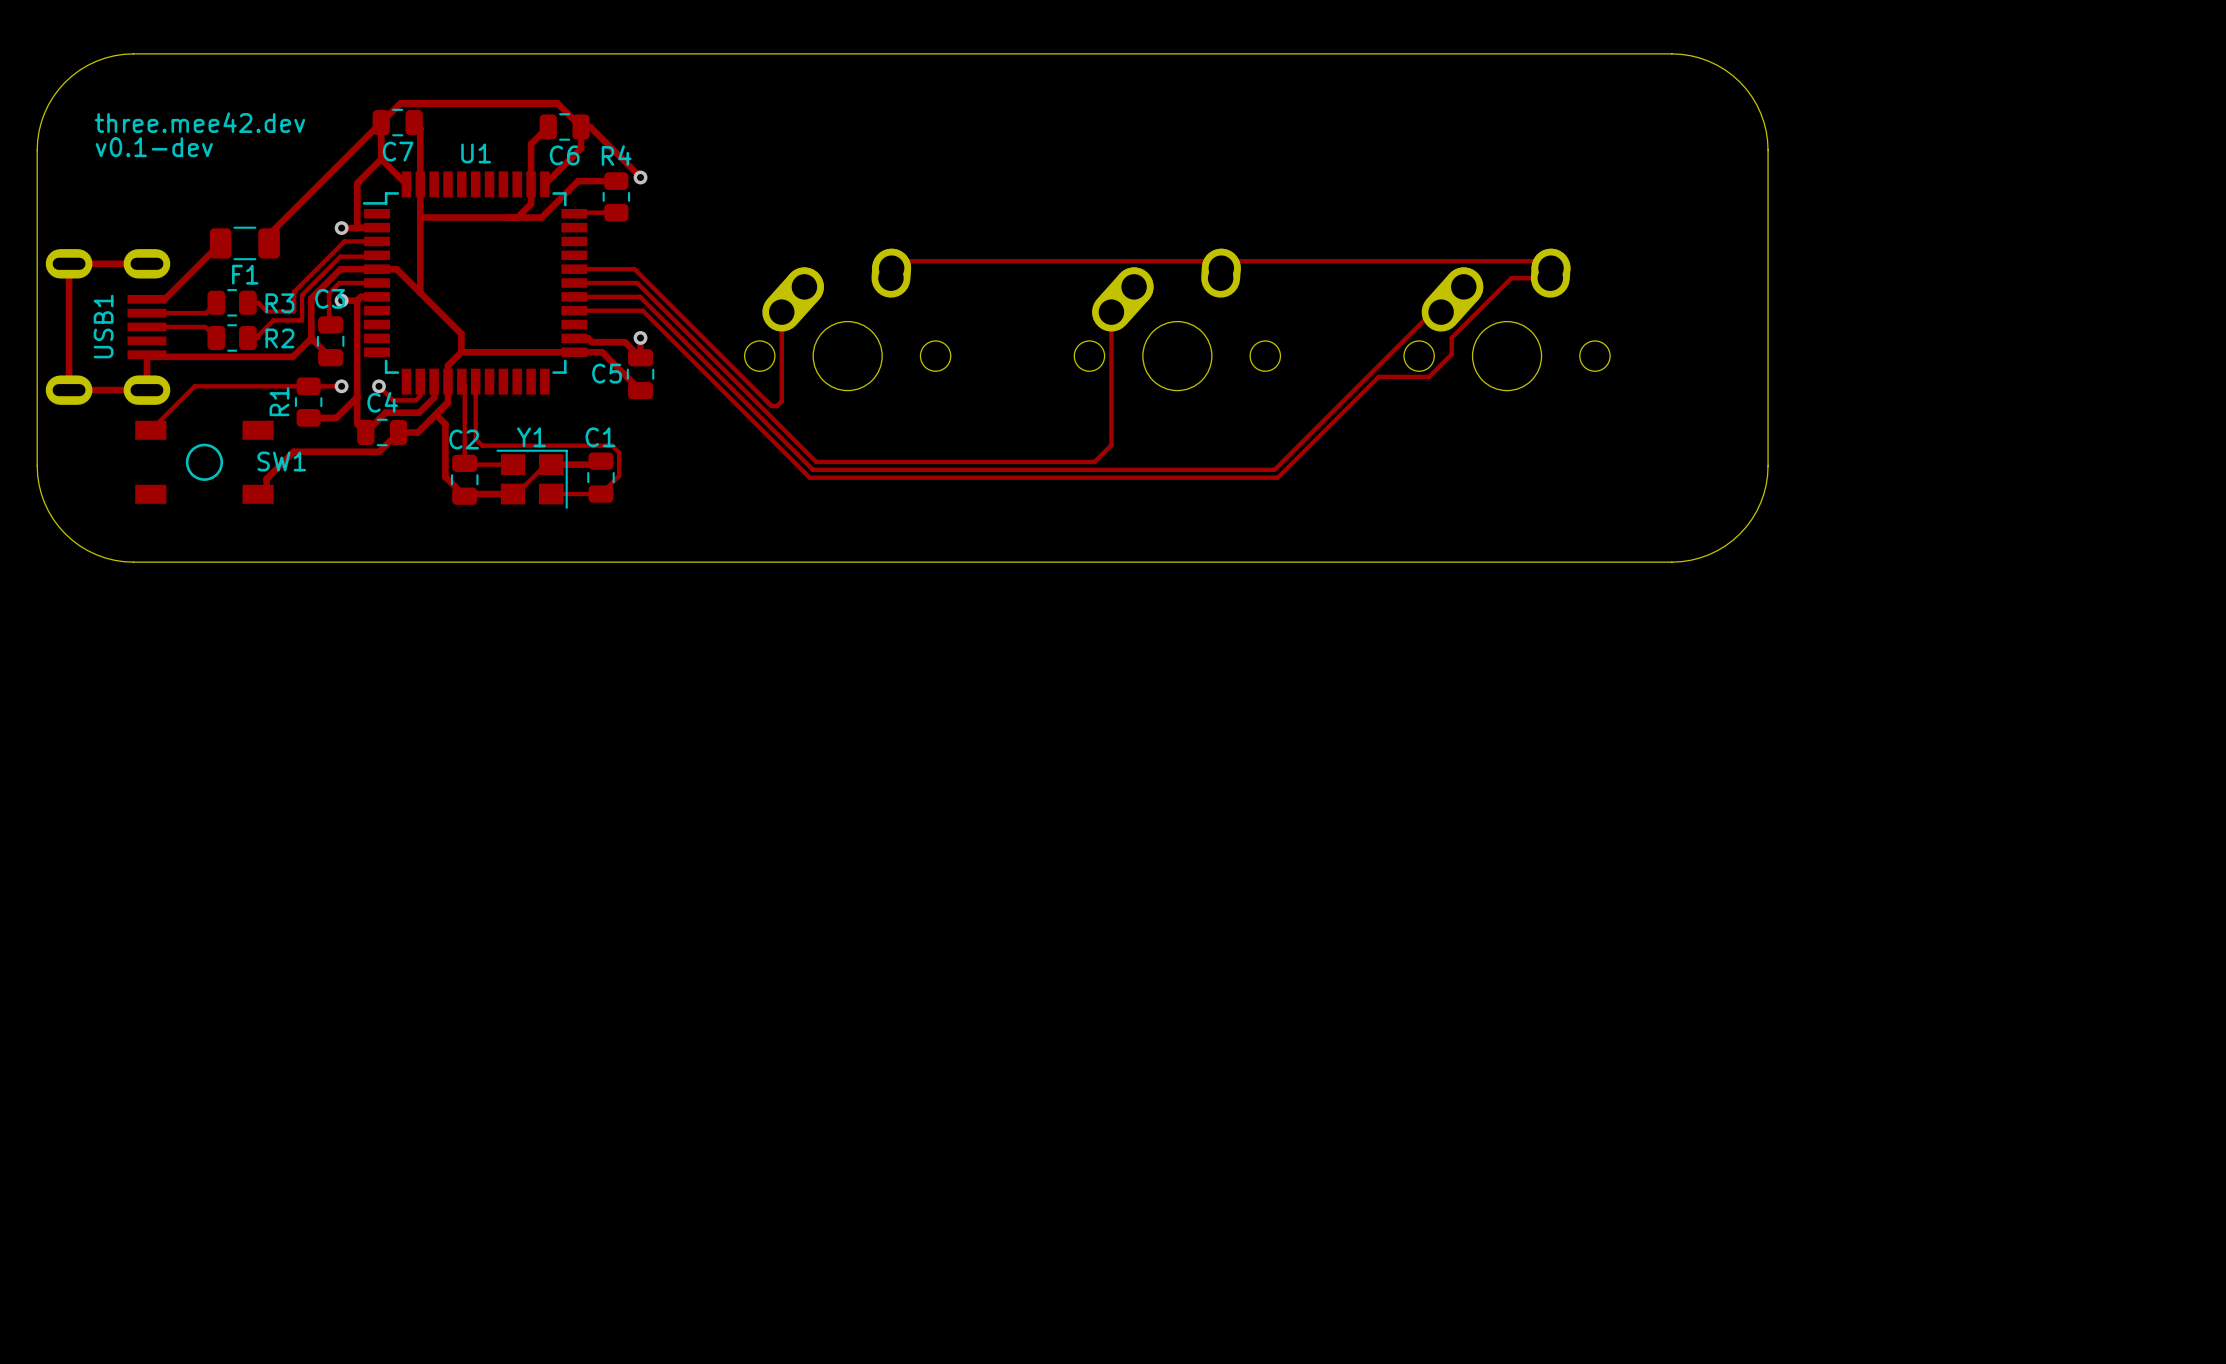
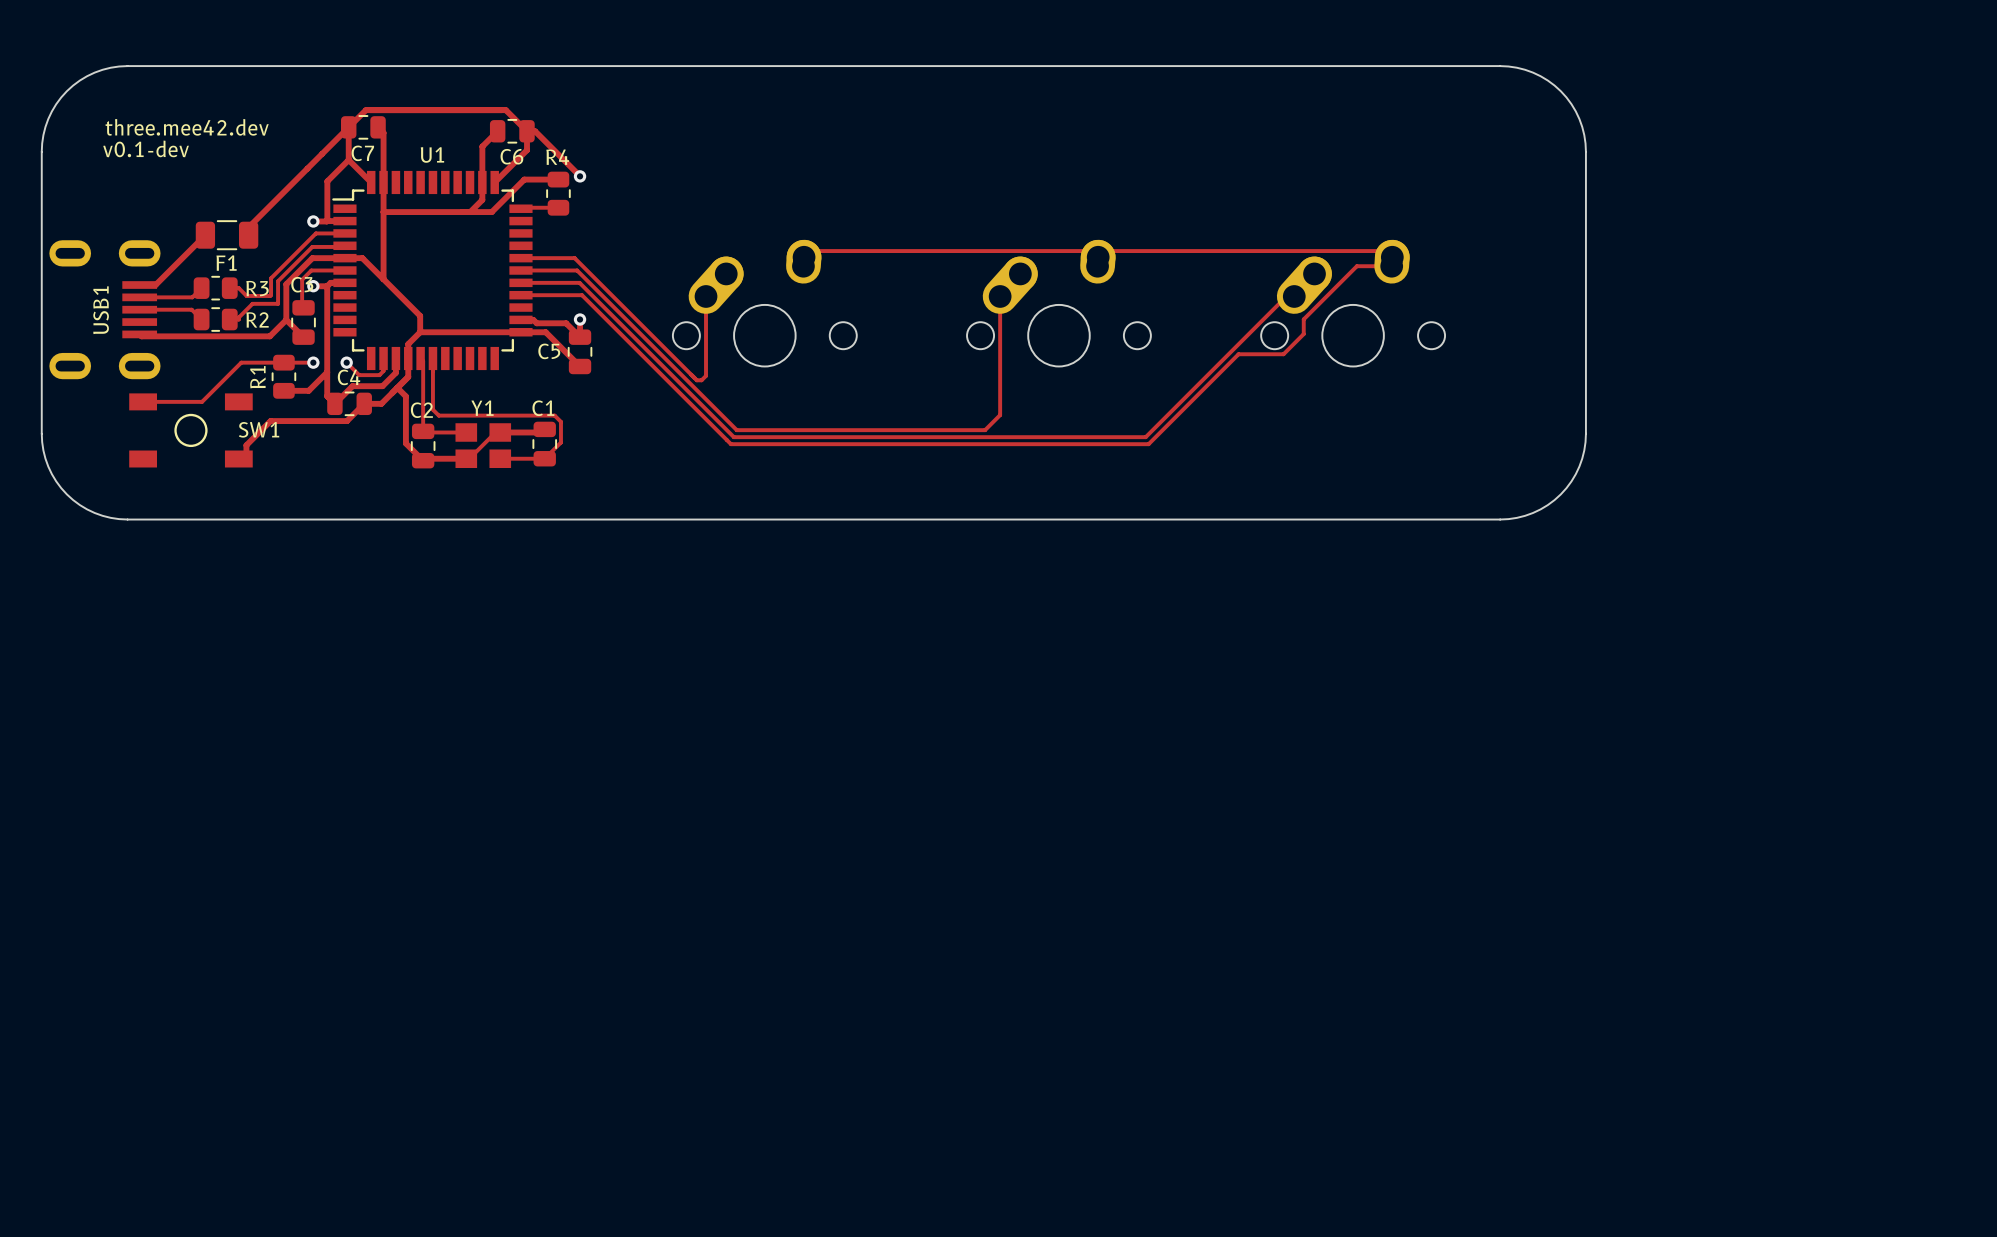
track: (146, 263) (69, 263) (69, 390) (146, 390) (146, 354) -> none
track: (260, 386) (194, 386) (150, 430) -> (241, 362) (202, 401) (143, 401)
Y1 footprint: [496, 449, 568, 509] -> [455, 423, 512, 469]

